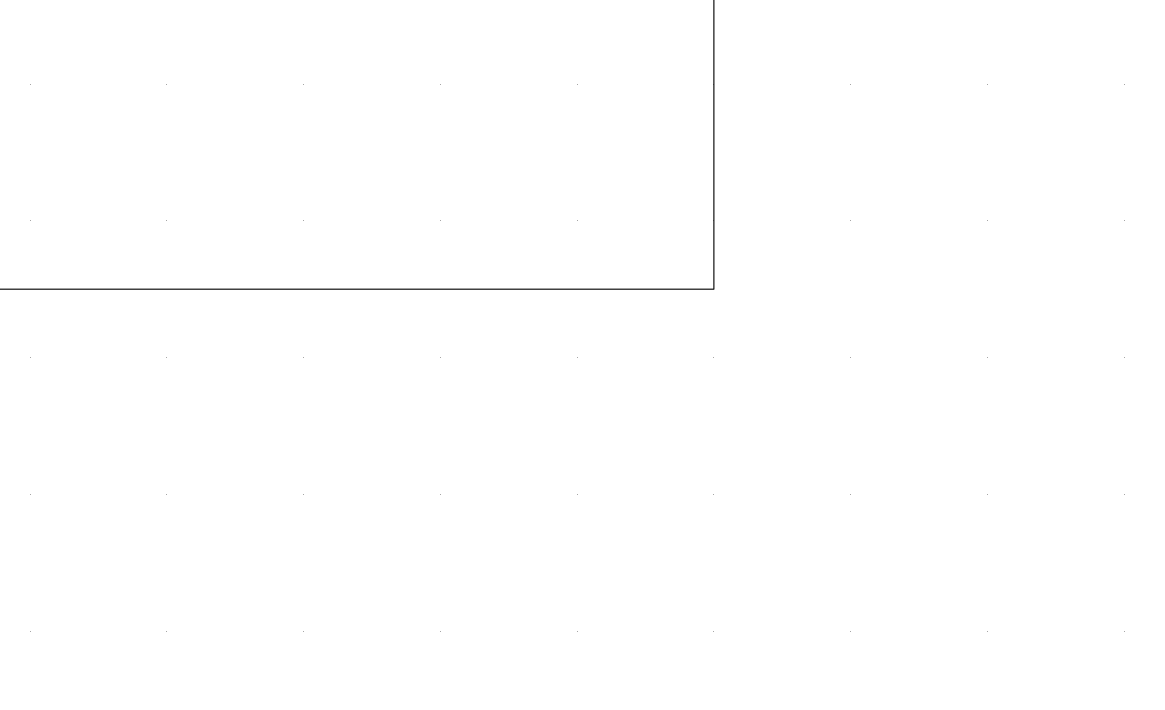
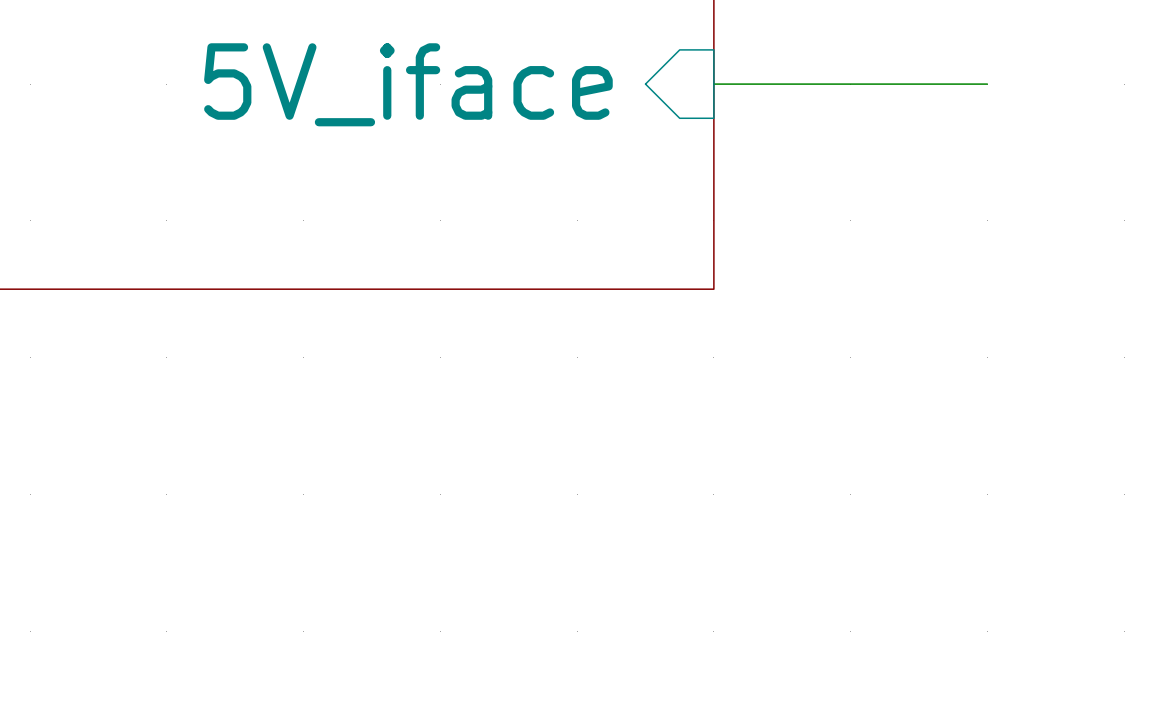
sheet pin: none -> 5V_iface (408, 84)
wire: none -> (713, 84) (987, 84)

